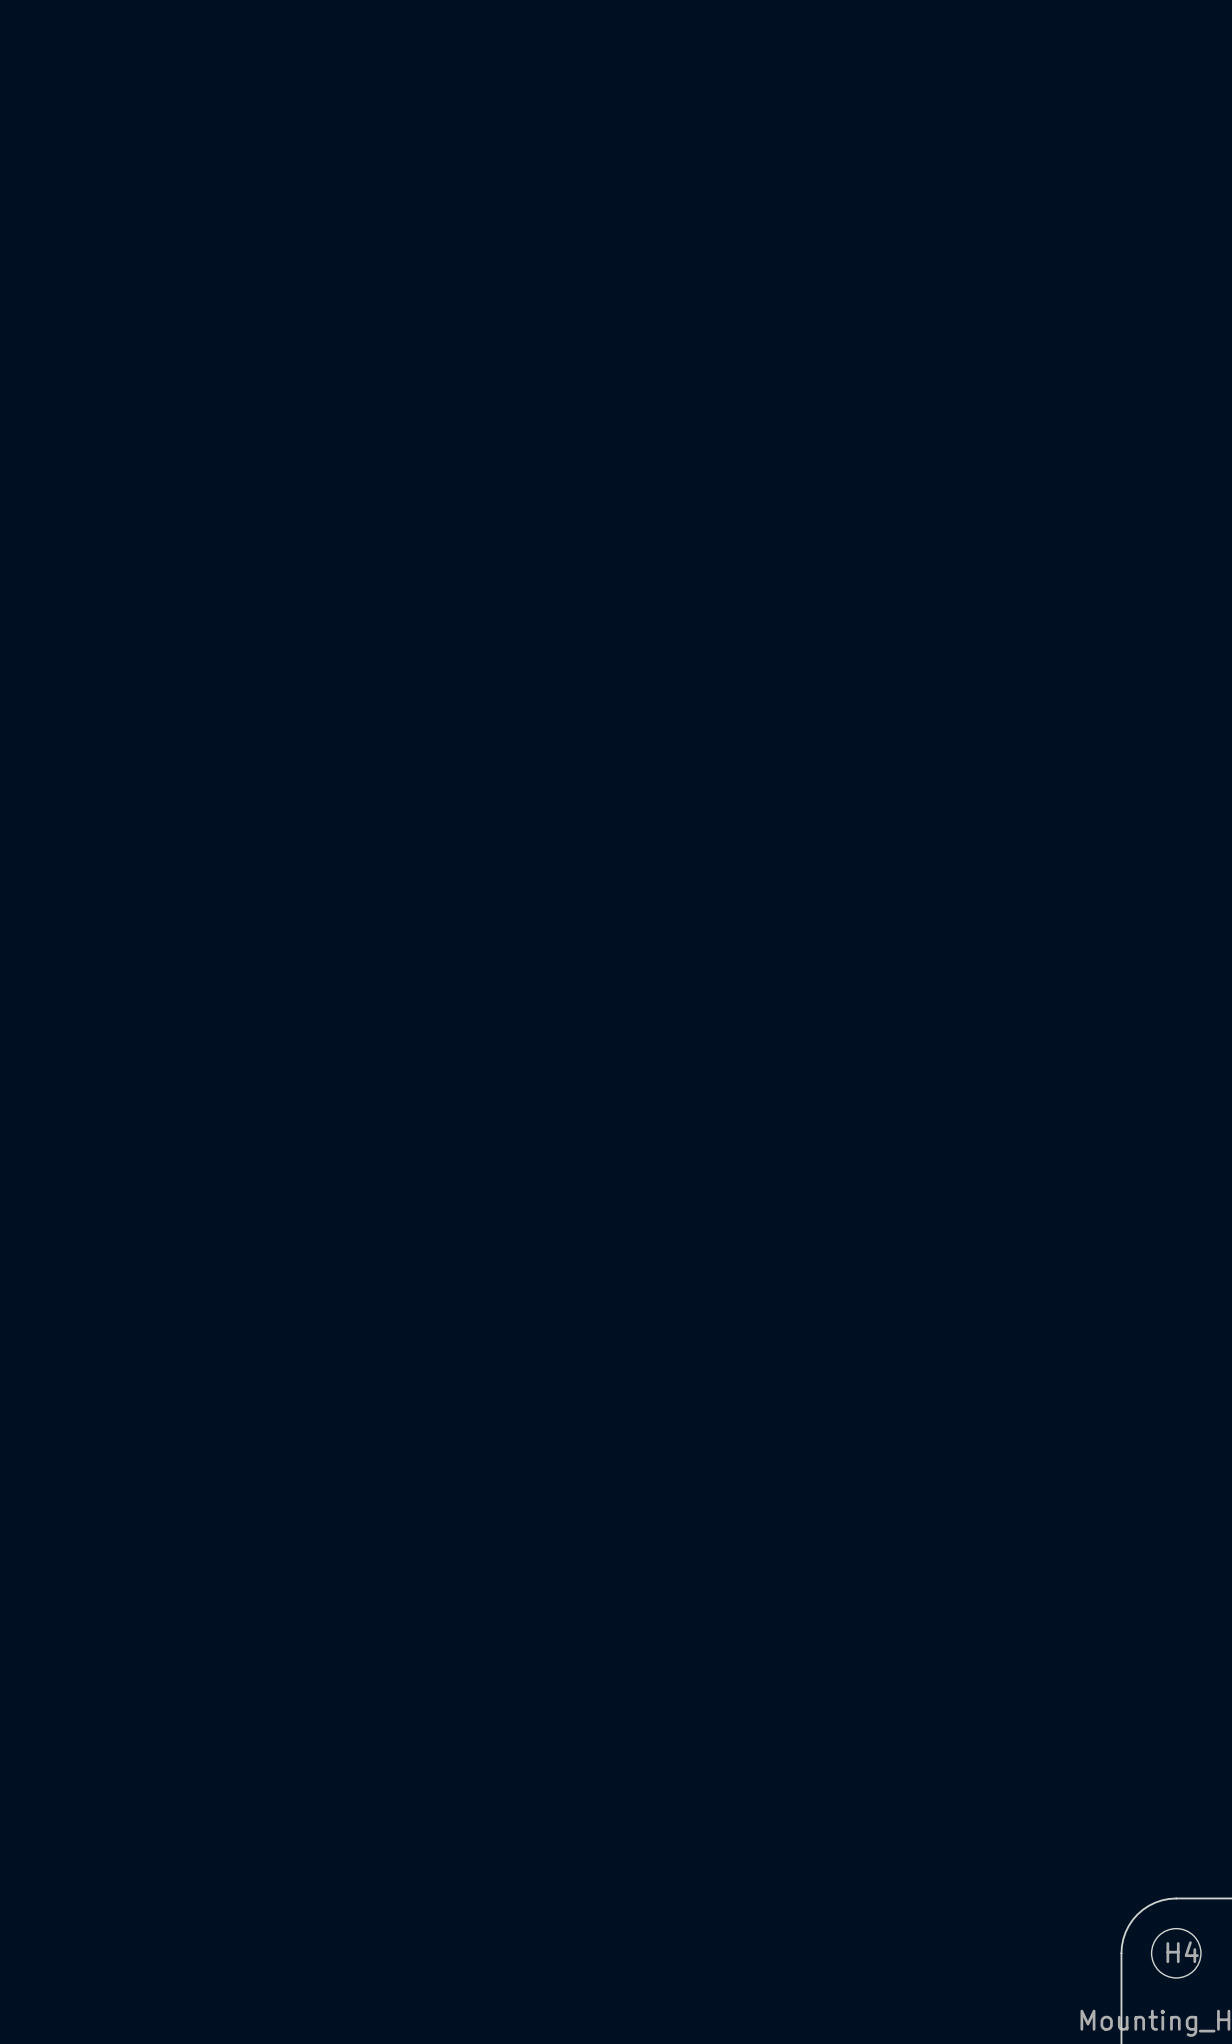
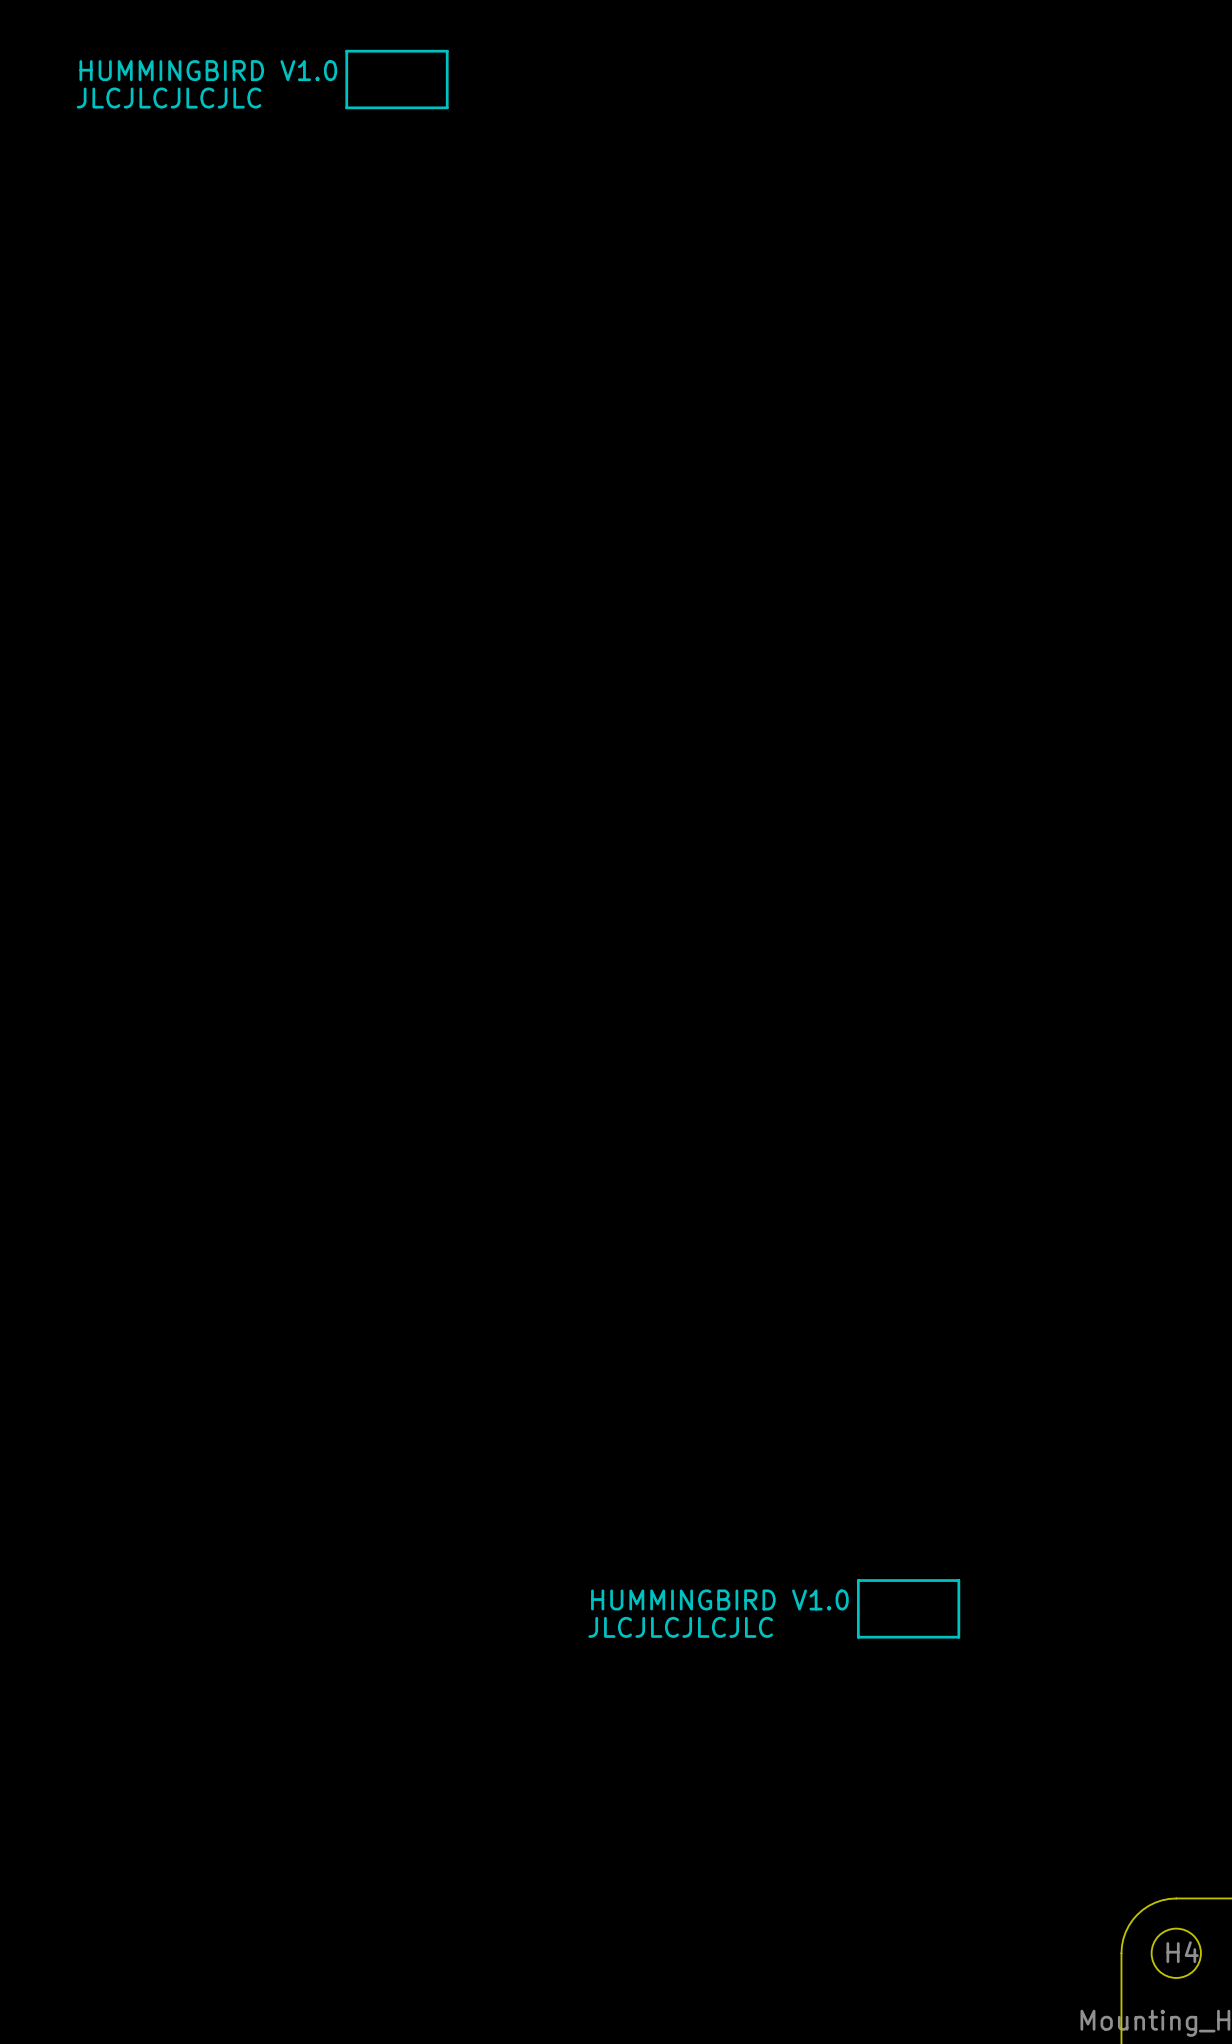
line: none -> (346, 51) (447, 51) (447, 107) (346, 107) (346, 51)
text: none -> HUMMINGBIRD V1.0 (208, 70)
text: none -> JLCJLCJLCJLC (169, 98)
line: none -> (858, 1580) (958, 1580) (958, 1637) (858, 1637) (858, 1580)
text: none -> HUMMINGBIRD V1.0 (719, 1599)
text: none -> JLCJLCJLCJLC (680, 1627)

